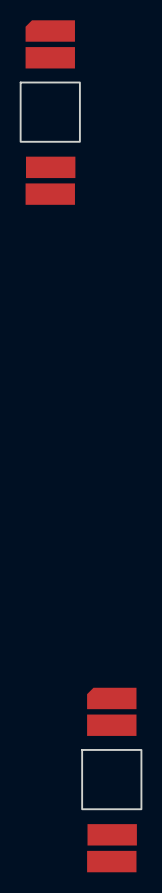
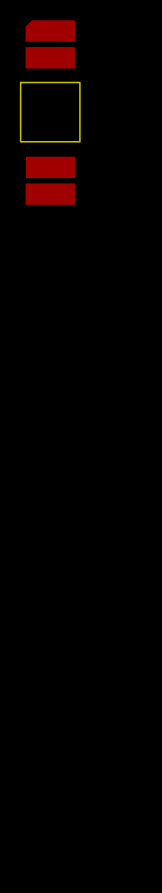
part: (111, 780) -> none

